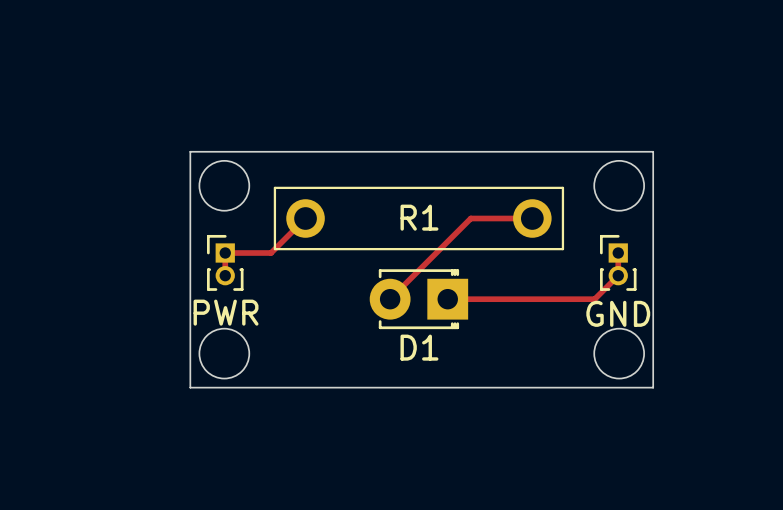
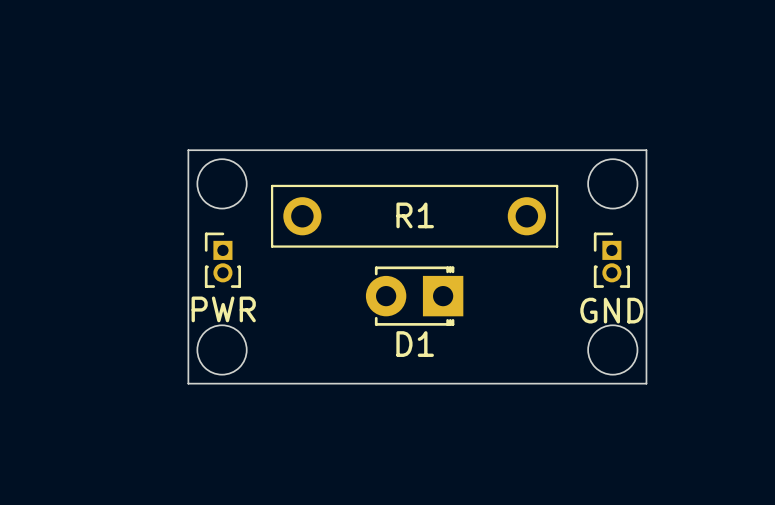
top track: (305, 218) (271, 253) (225, 253) (225, 275) -> none
top track: (532, 218) (470, 218) (390, 299) -> none
top track: (618, 252) (618, 275) (594, 299) (447, 299) -> none

